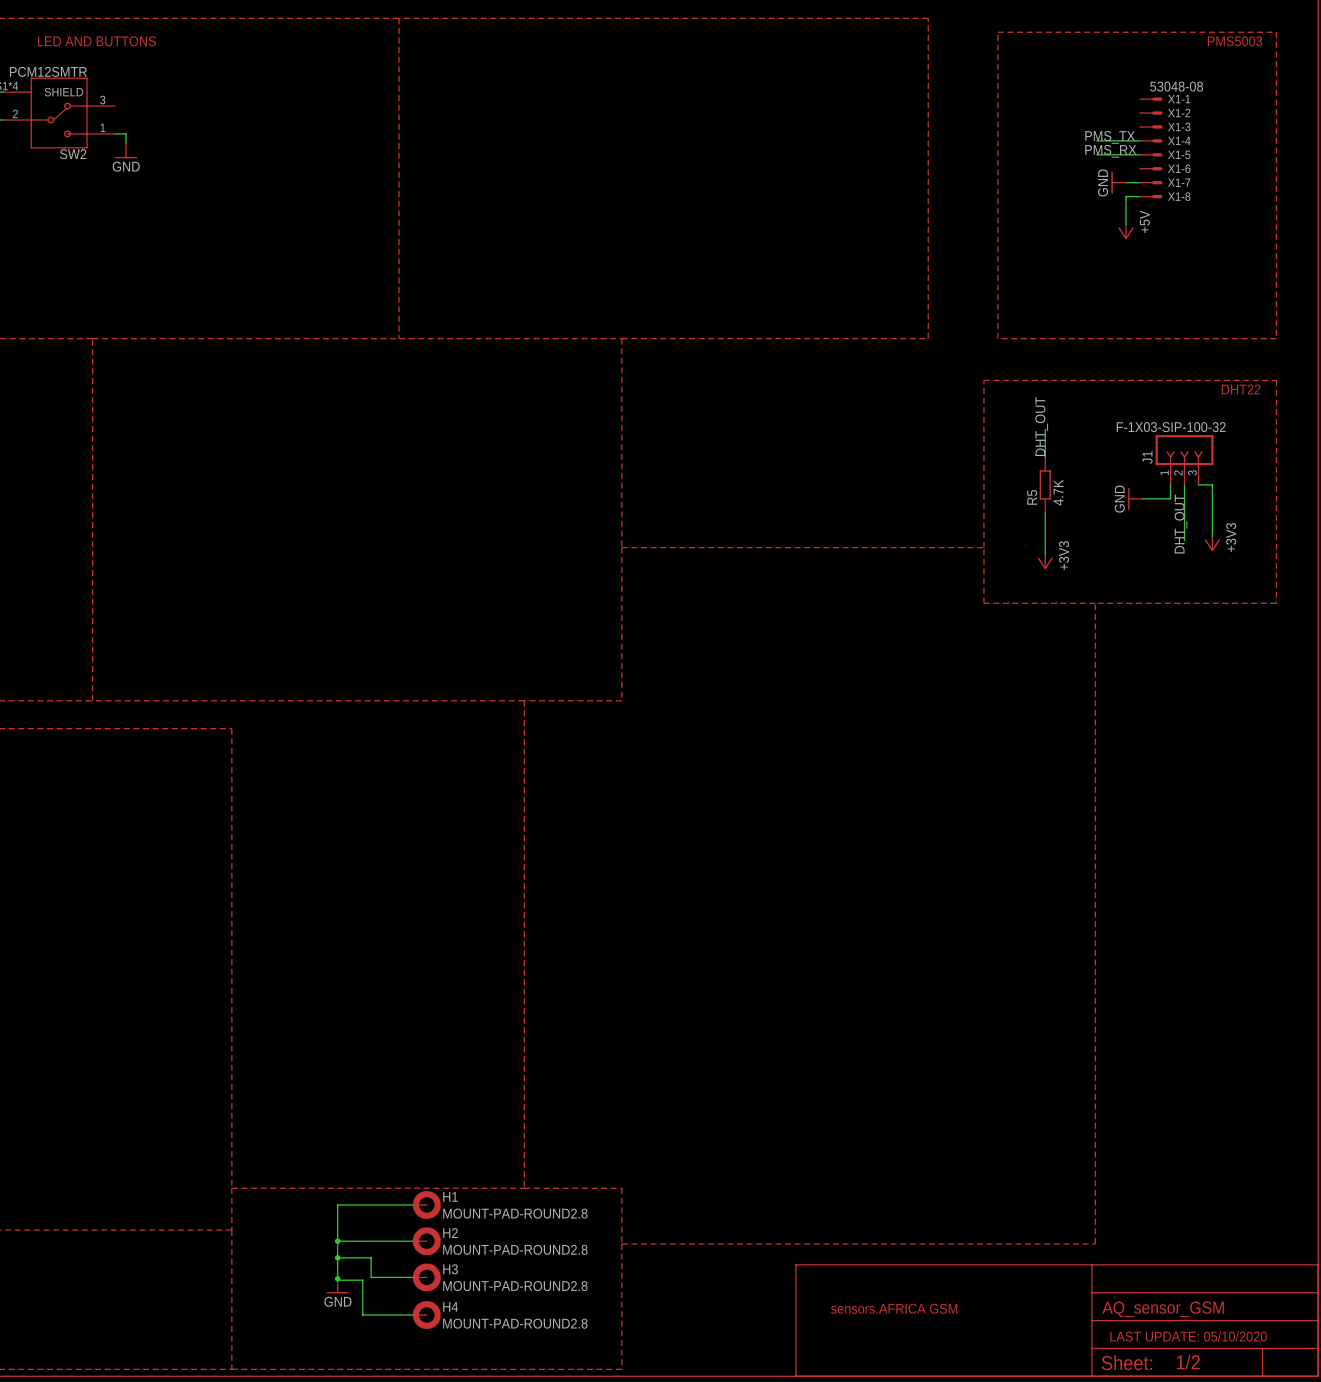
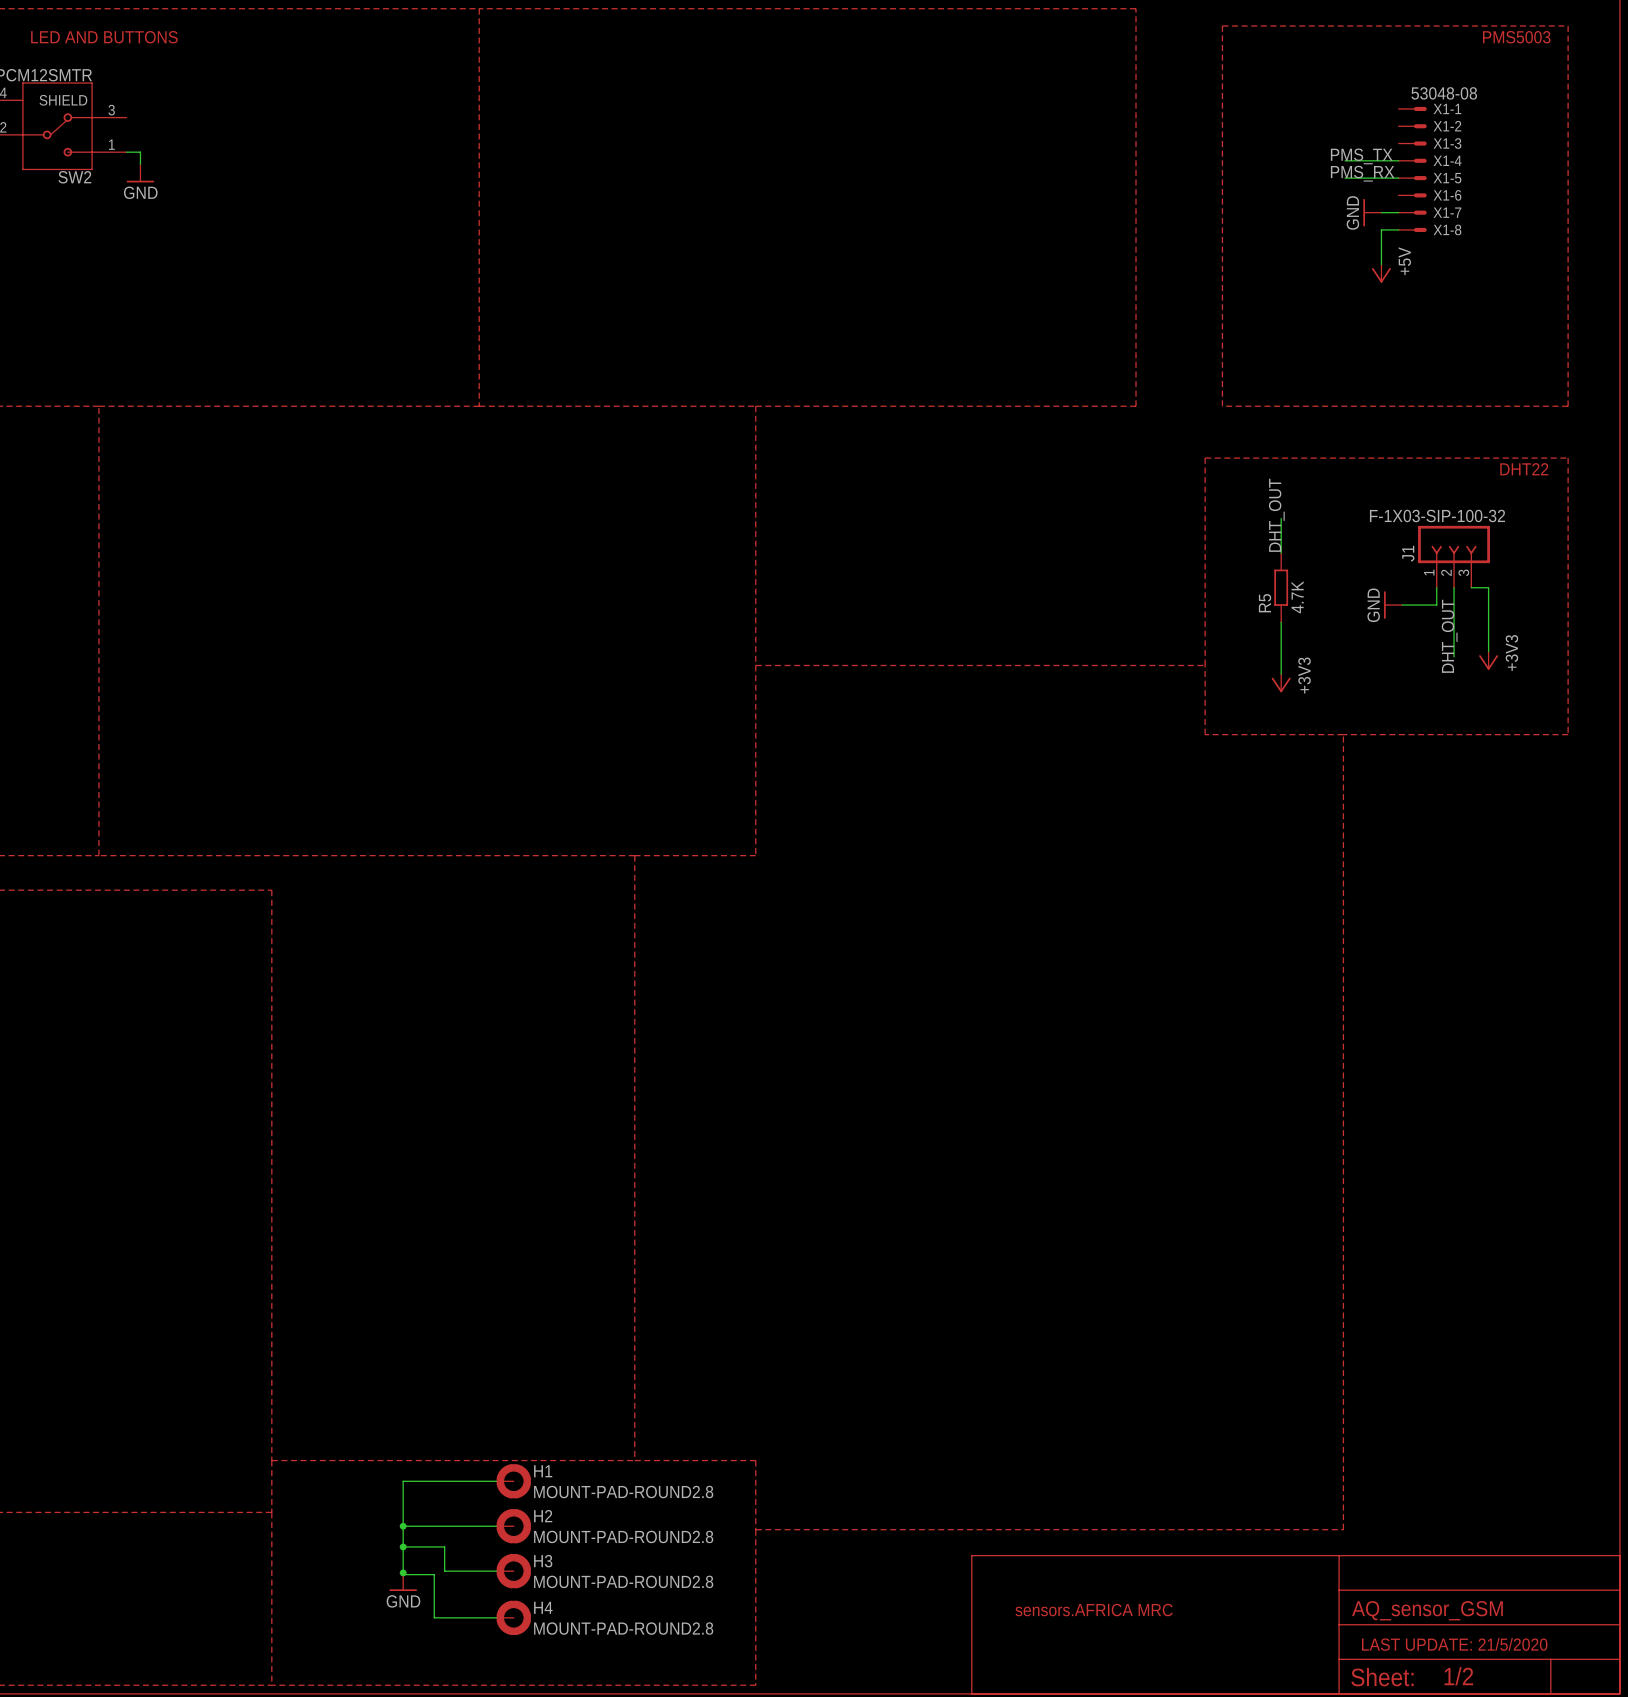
text: sensors.AFRICA GSM (894, 1308) -> sensors.AFRICA MRC (1094, 1610)
text: LAST UPDATE: 05/10/2020 (1188, 1336) -> LAST UPDATE: 21/5/2020 (1454, 1644)

